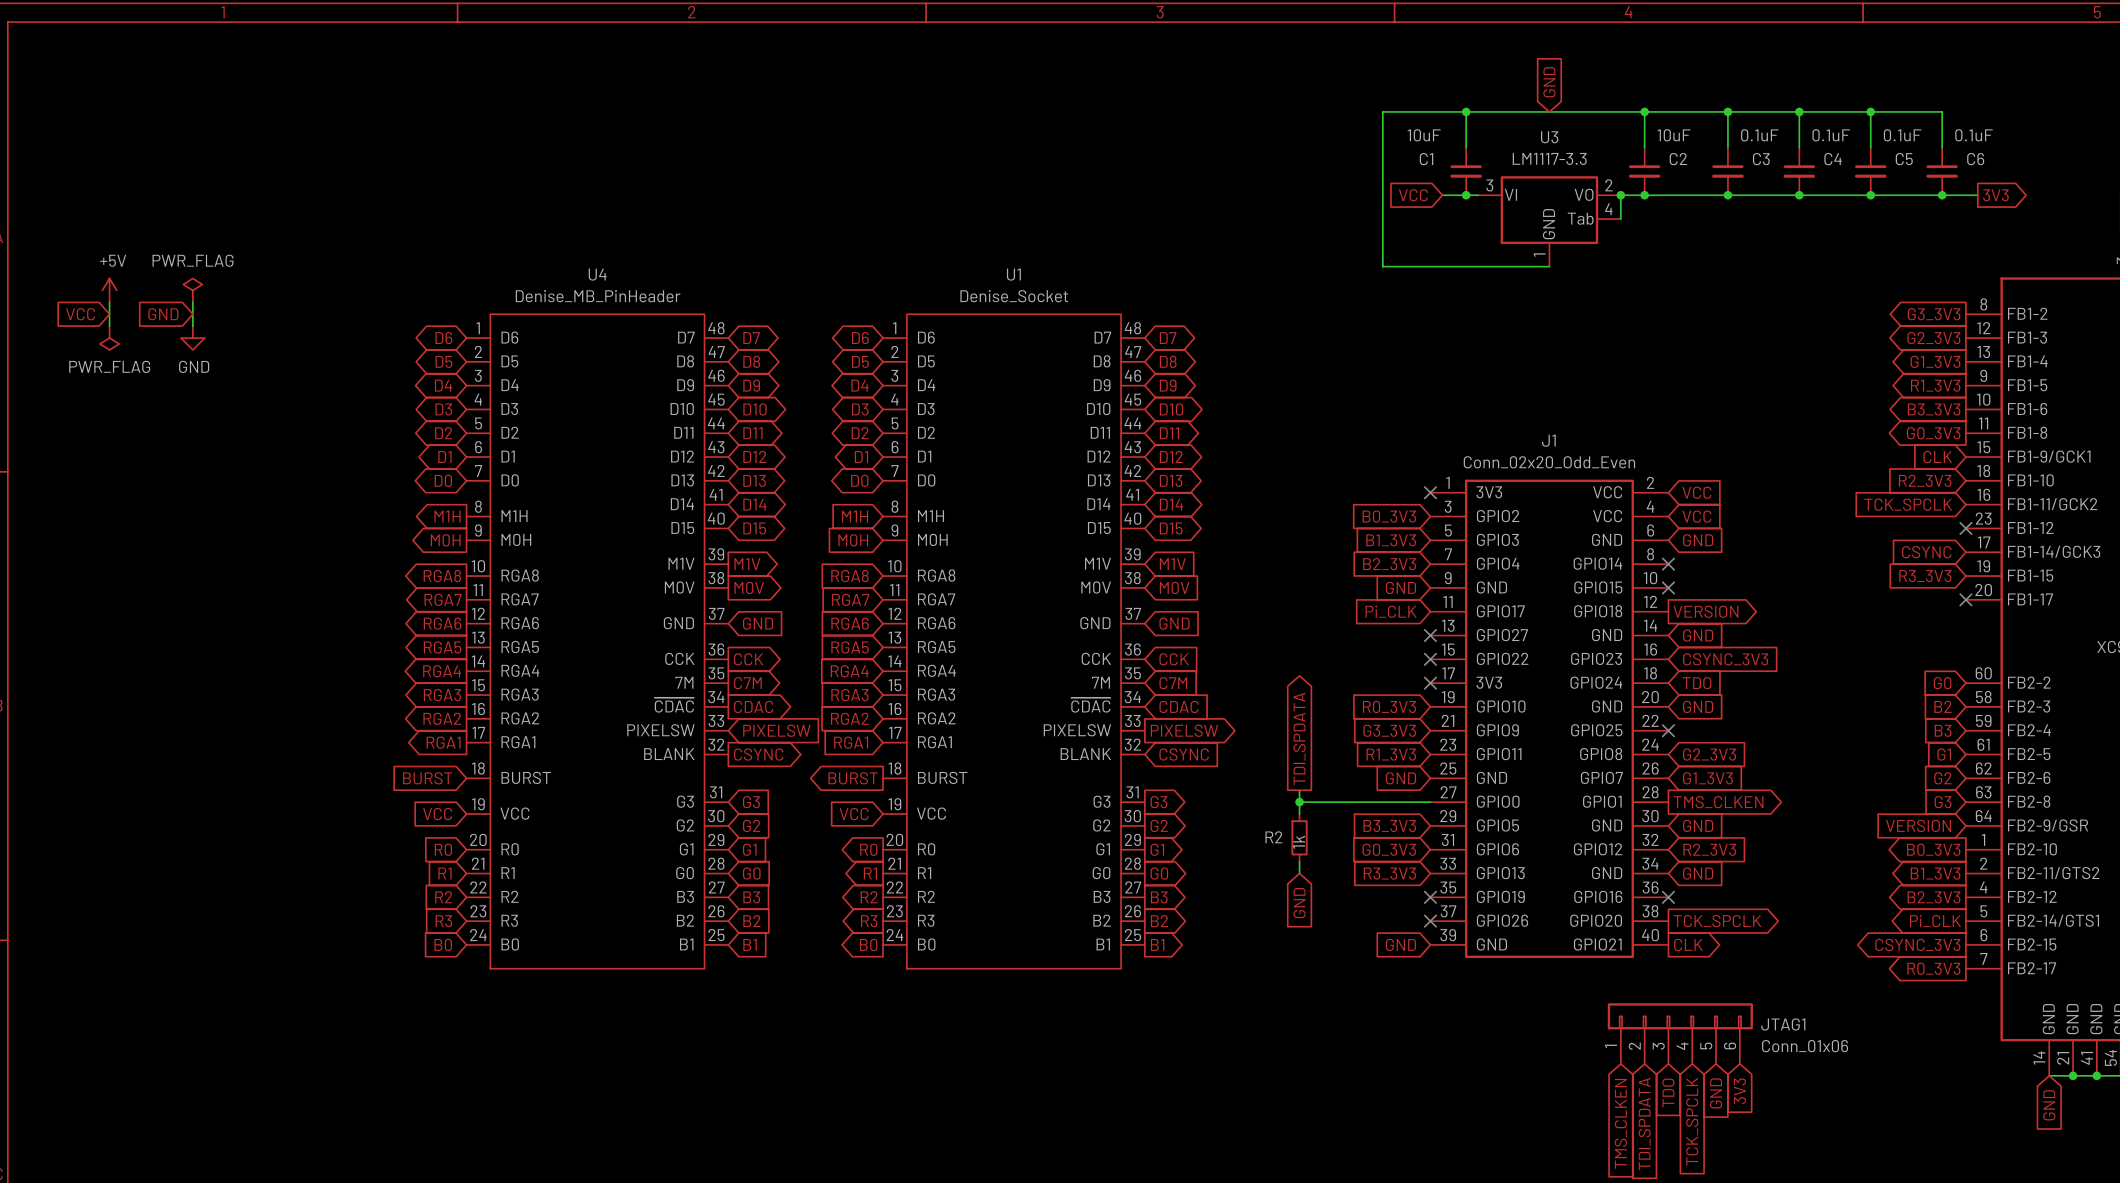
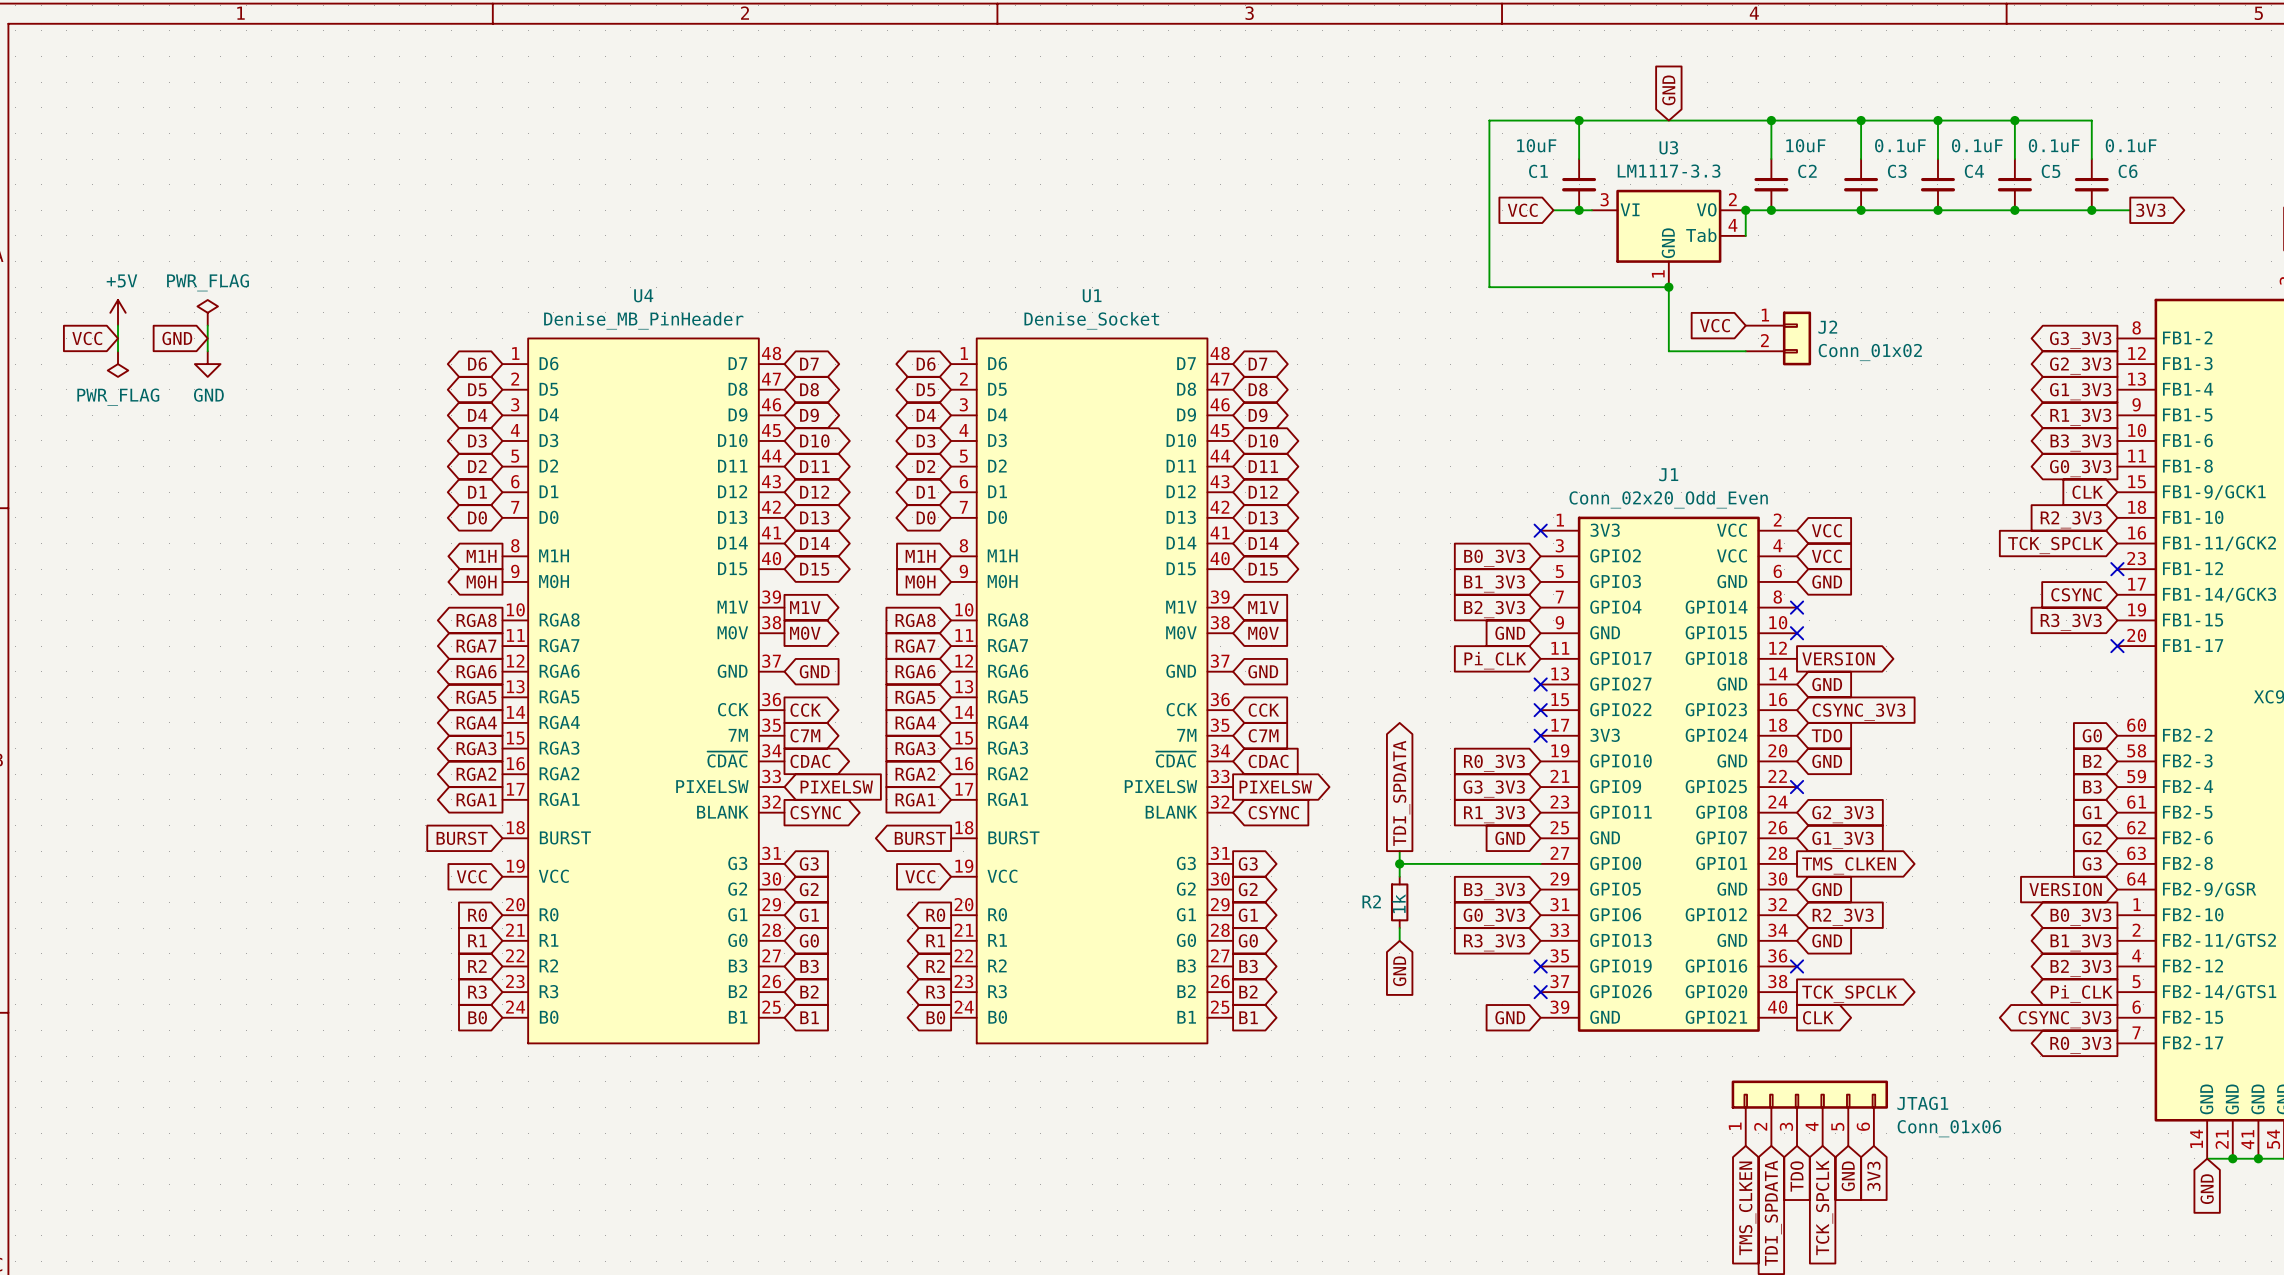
wire: none -> (1668, 287) (1668, 351) (1745, 351)
junction: none -> (1668, 287)
global label: none -> VCC (1715, 325)
J2: none -> Conn_01x02 (1778, 338)

